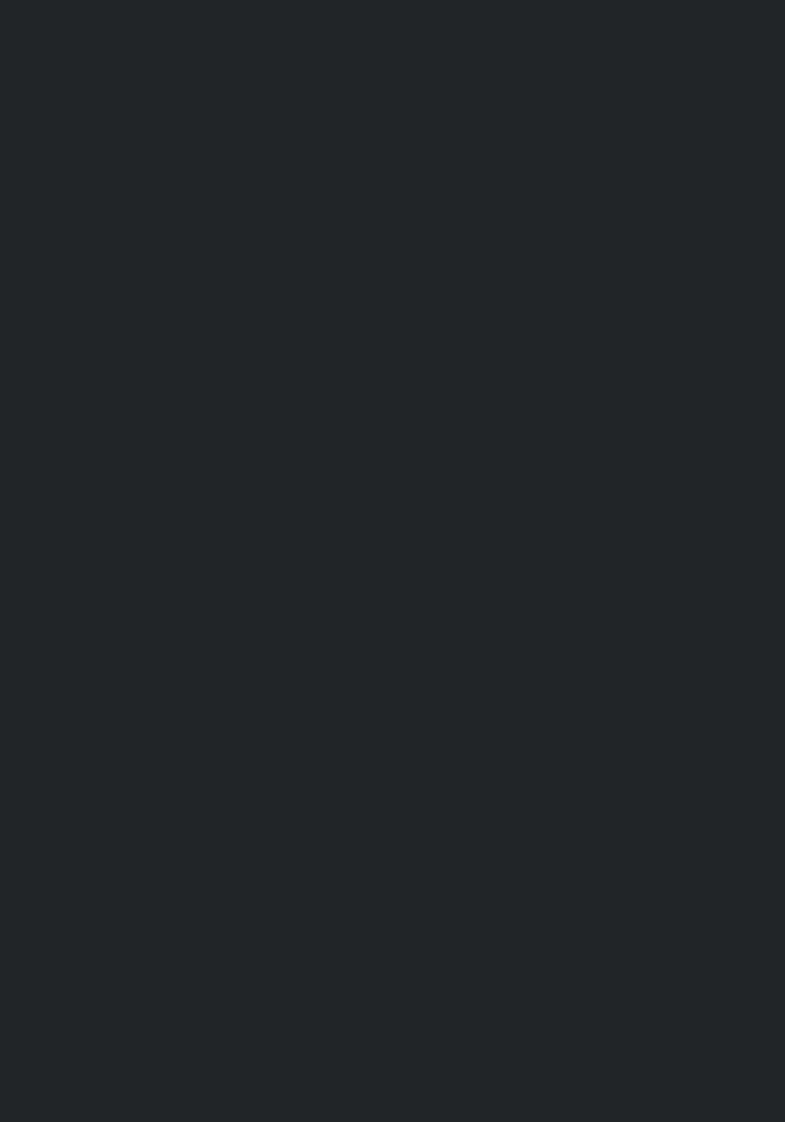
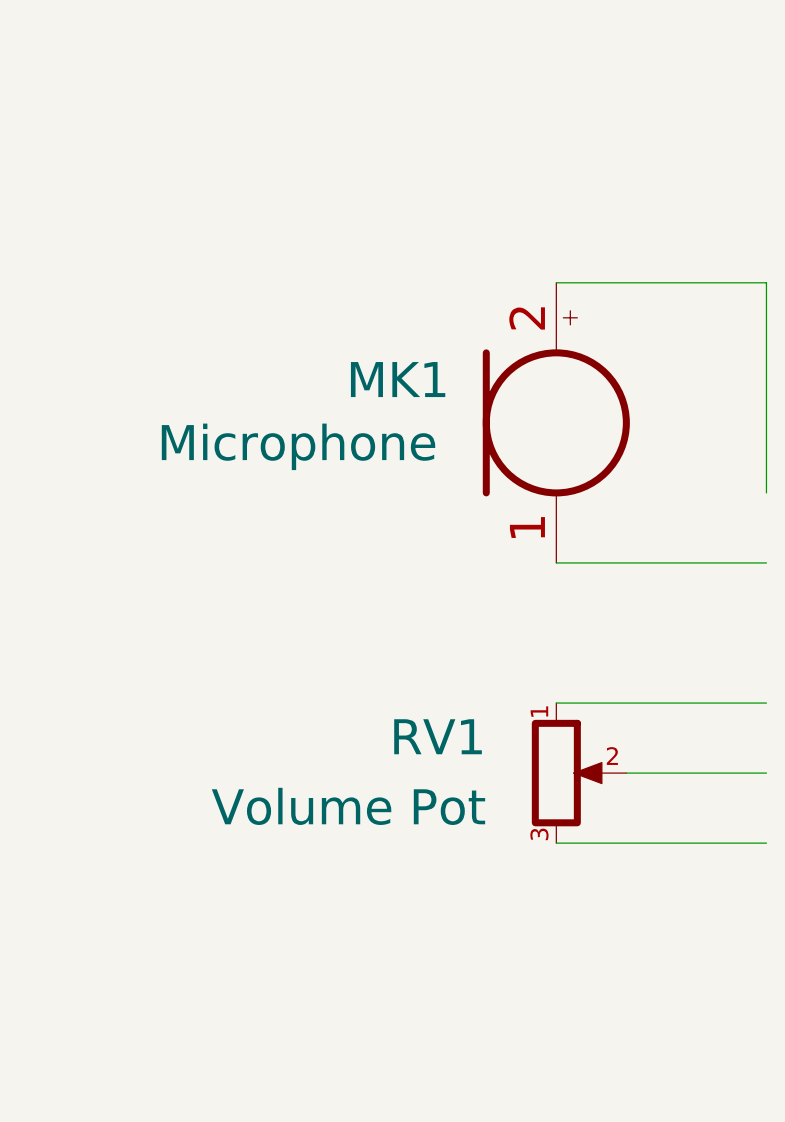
wire: none -> (556, 282) (766, 282) (766, 492)
MK1: none -> Microphone (556, 422)
wire: none -> (556, 562) (766, 562)
wire: none -> (556, 703) (766, 703)
RV1: none -> Volume Pot (579, 773)
wire: none -> (626, 773) (766, 773)
wire: none -> (556, 843) (766, 843)

